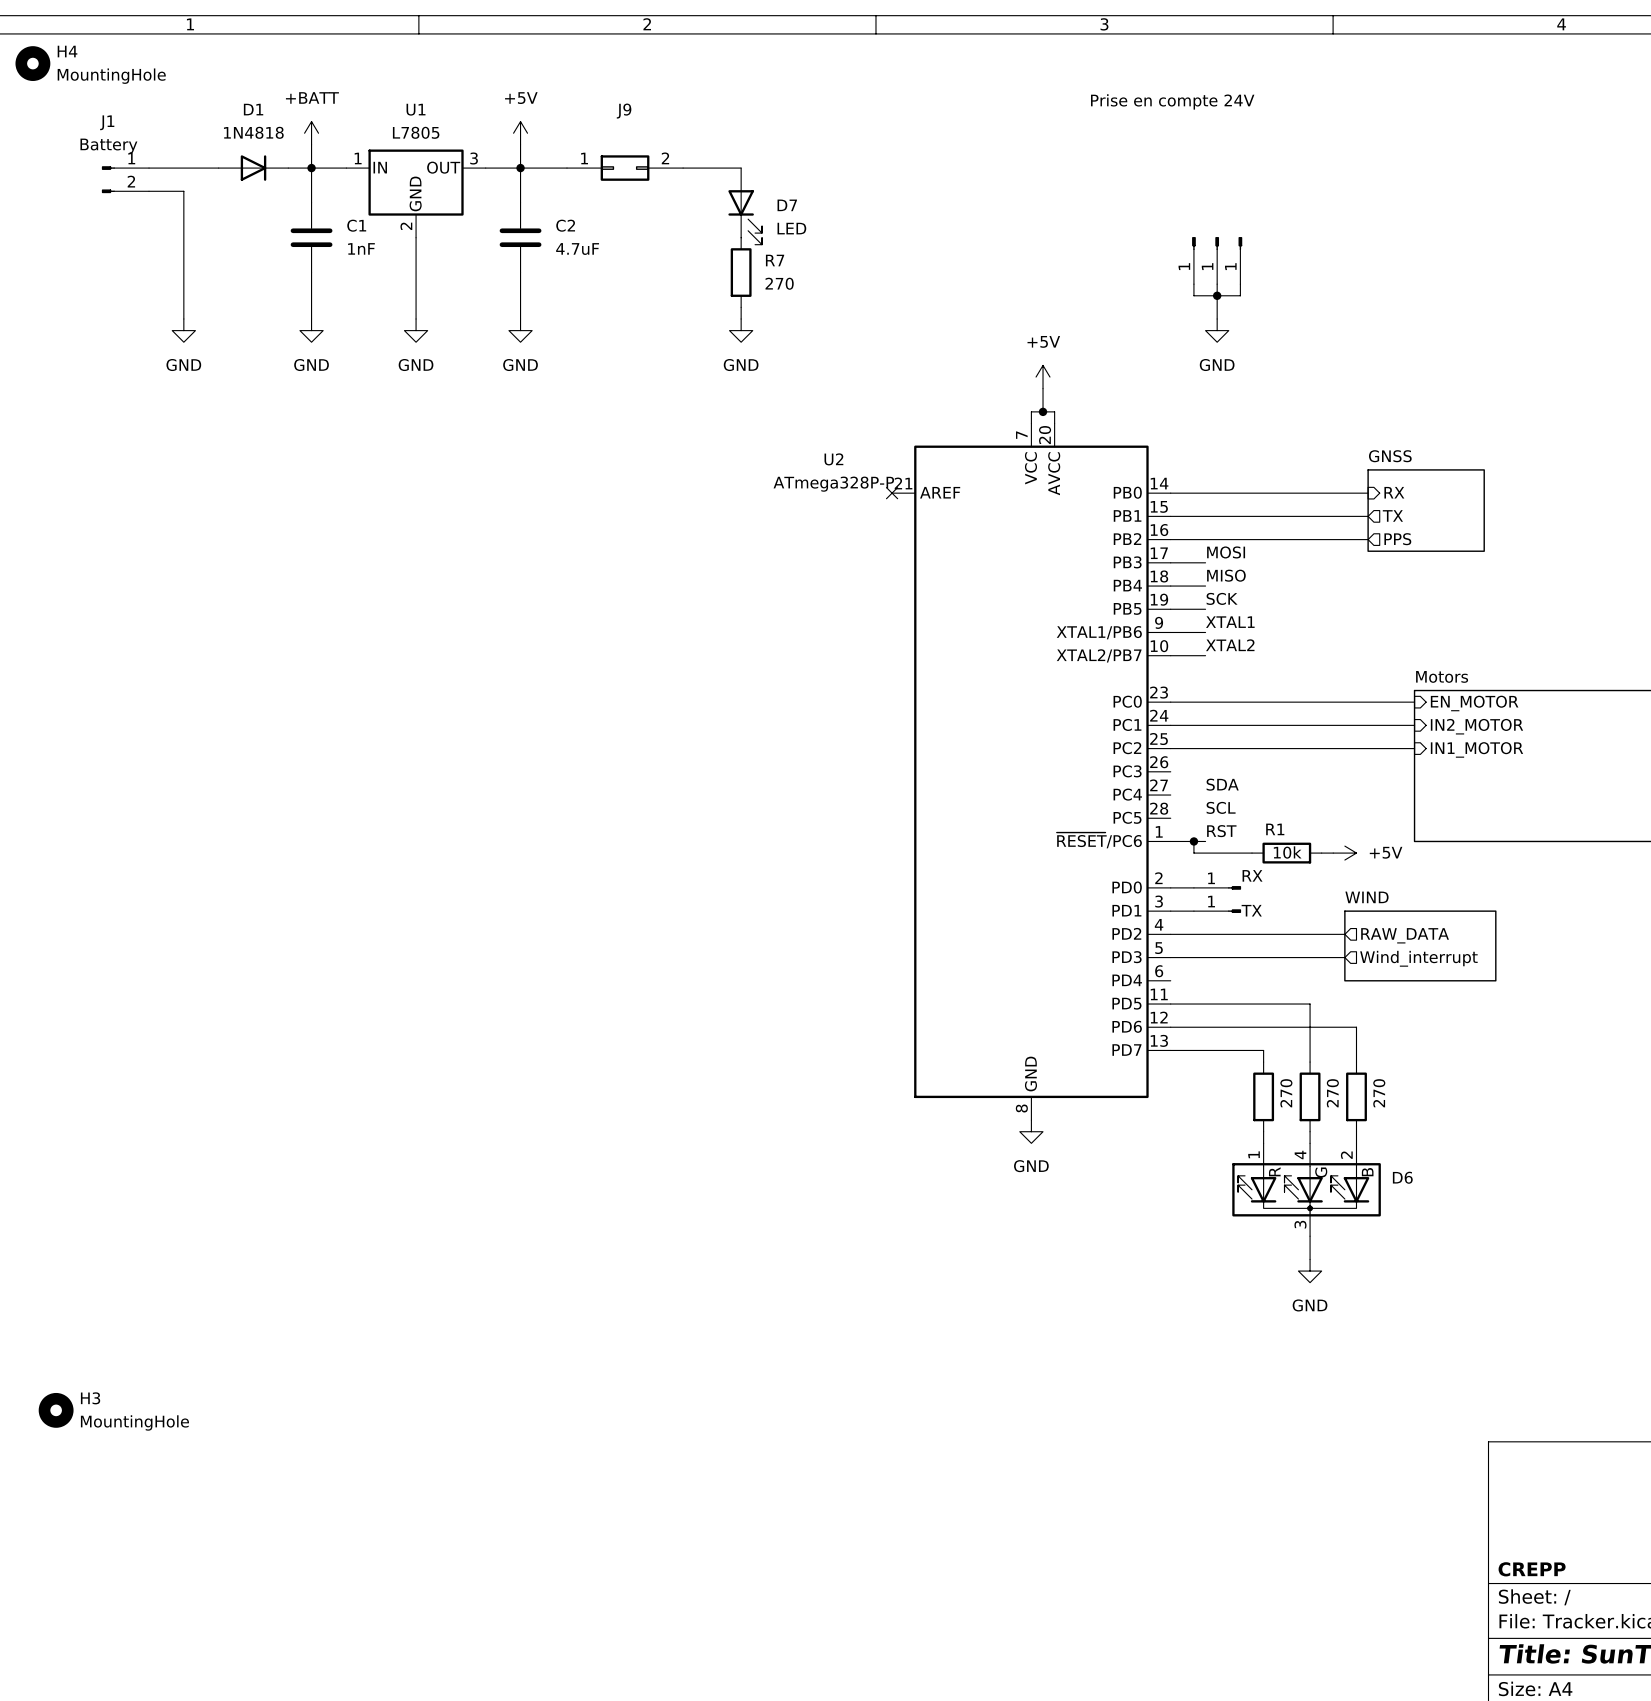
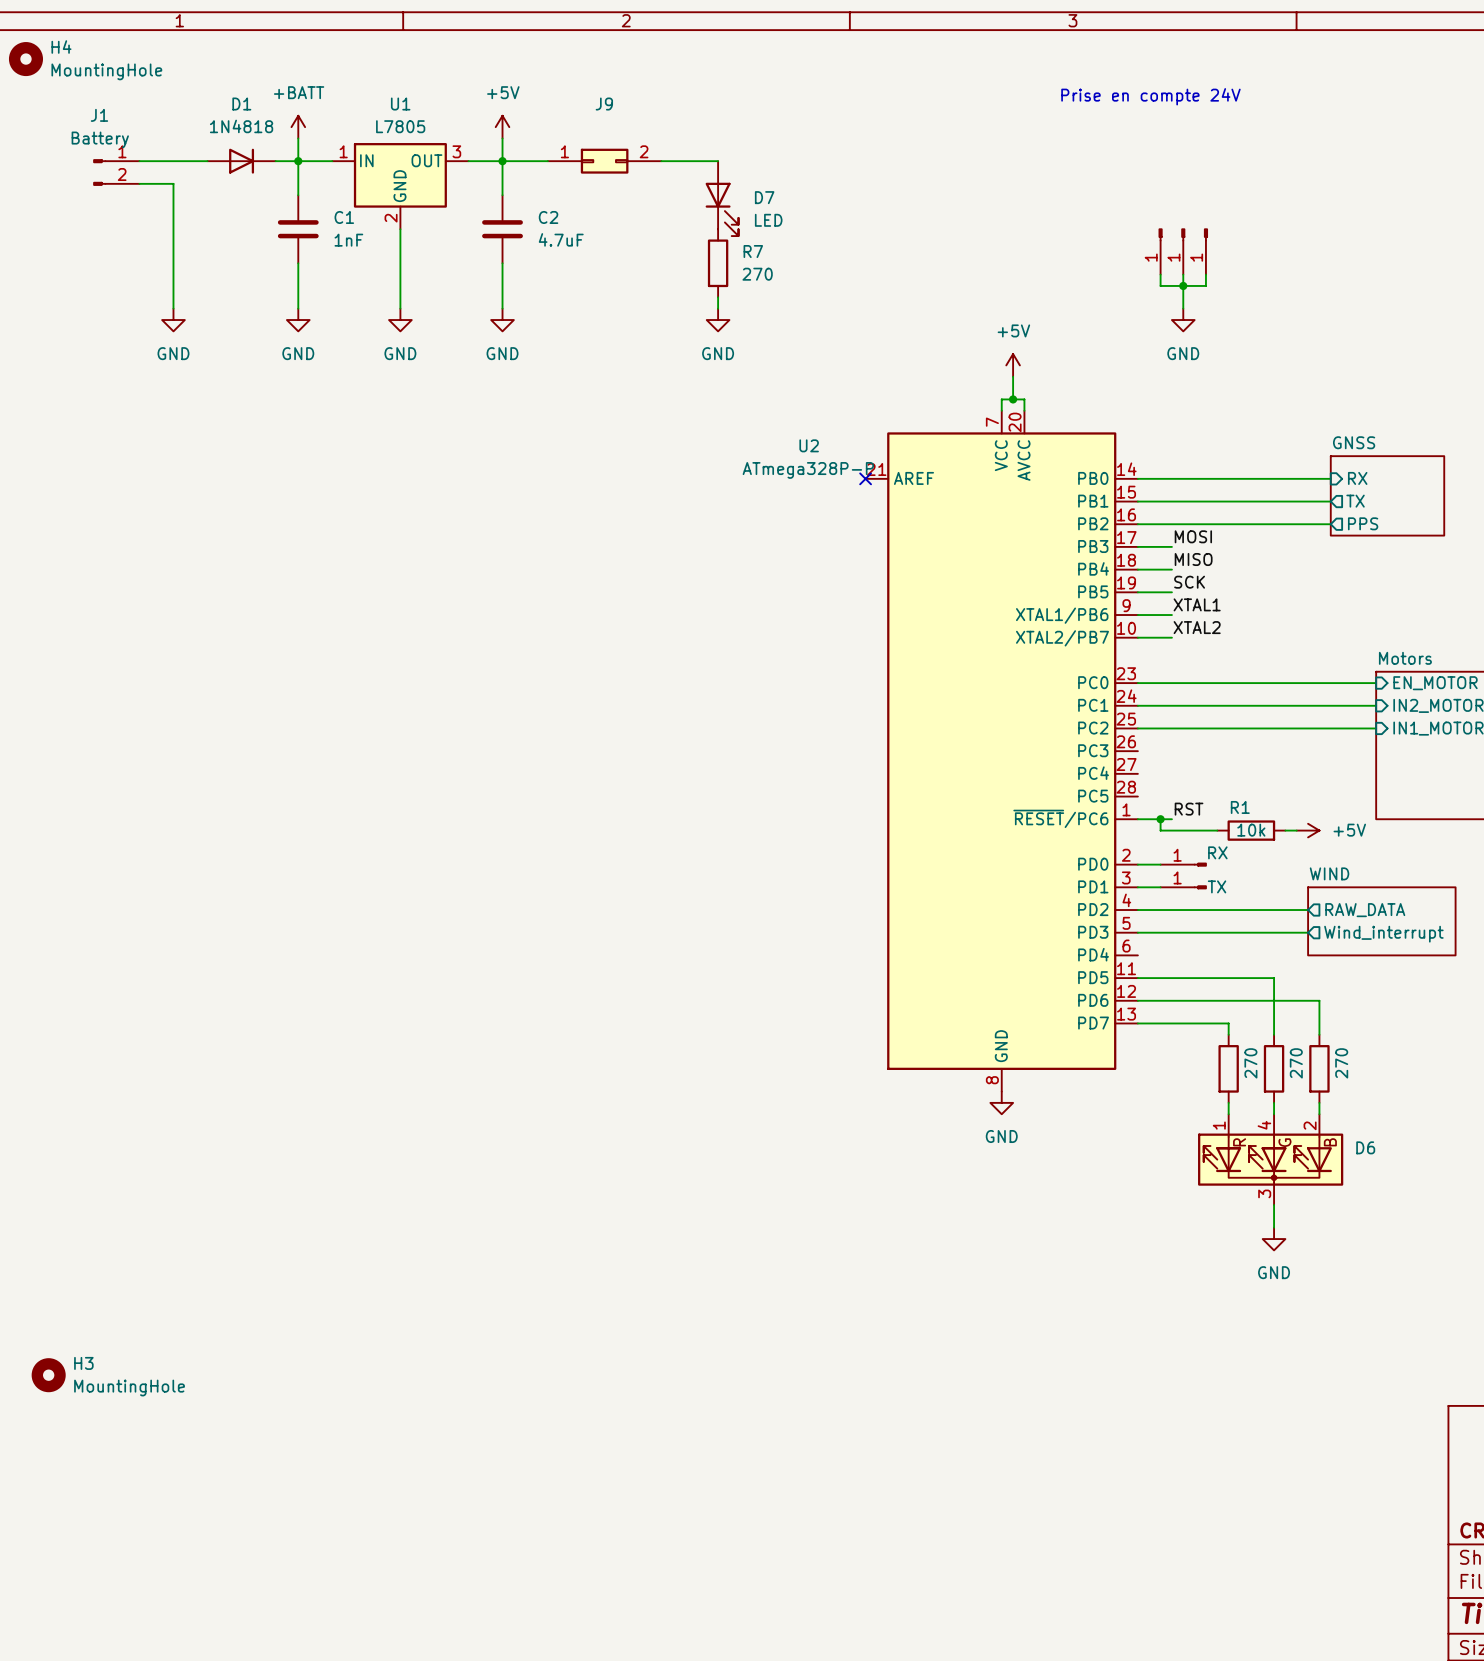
label: SDA (1222, 784) -> none
label: SCL (1221, 807) -> none

